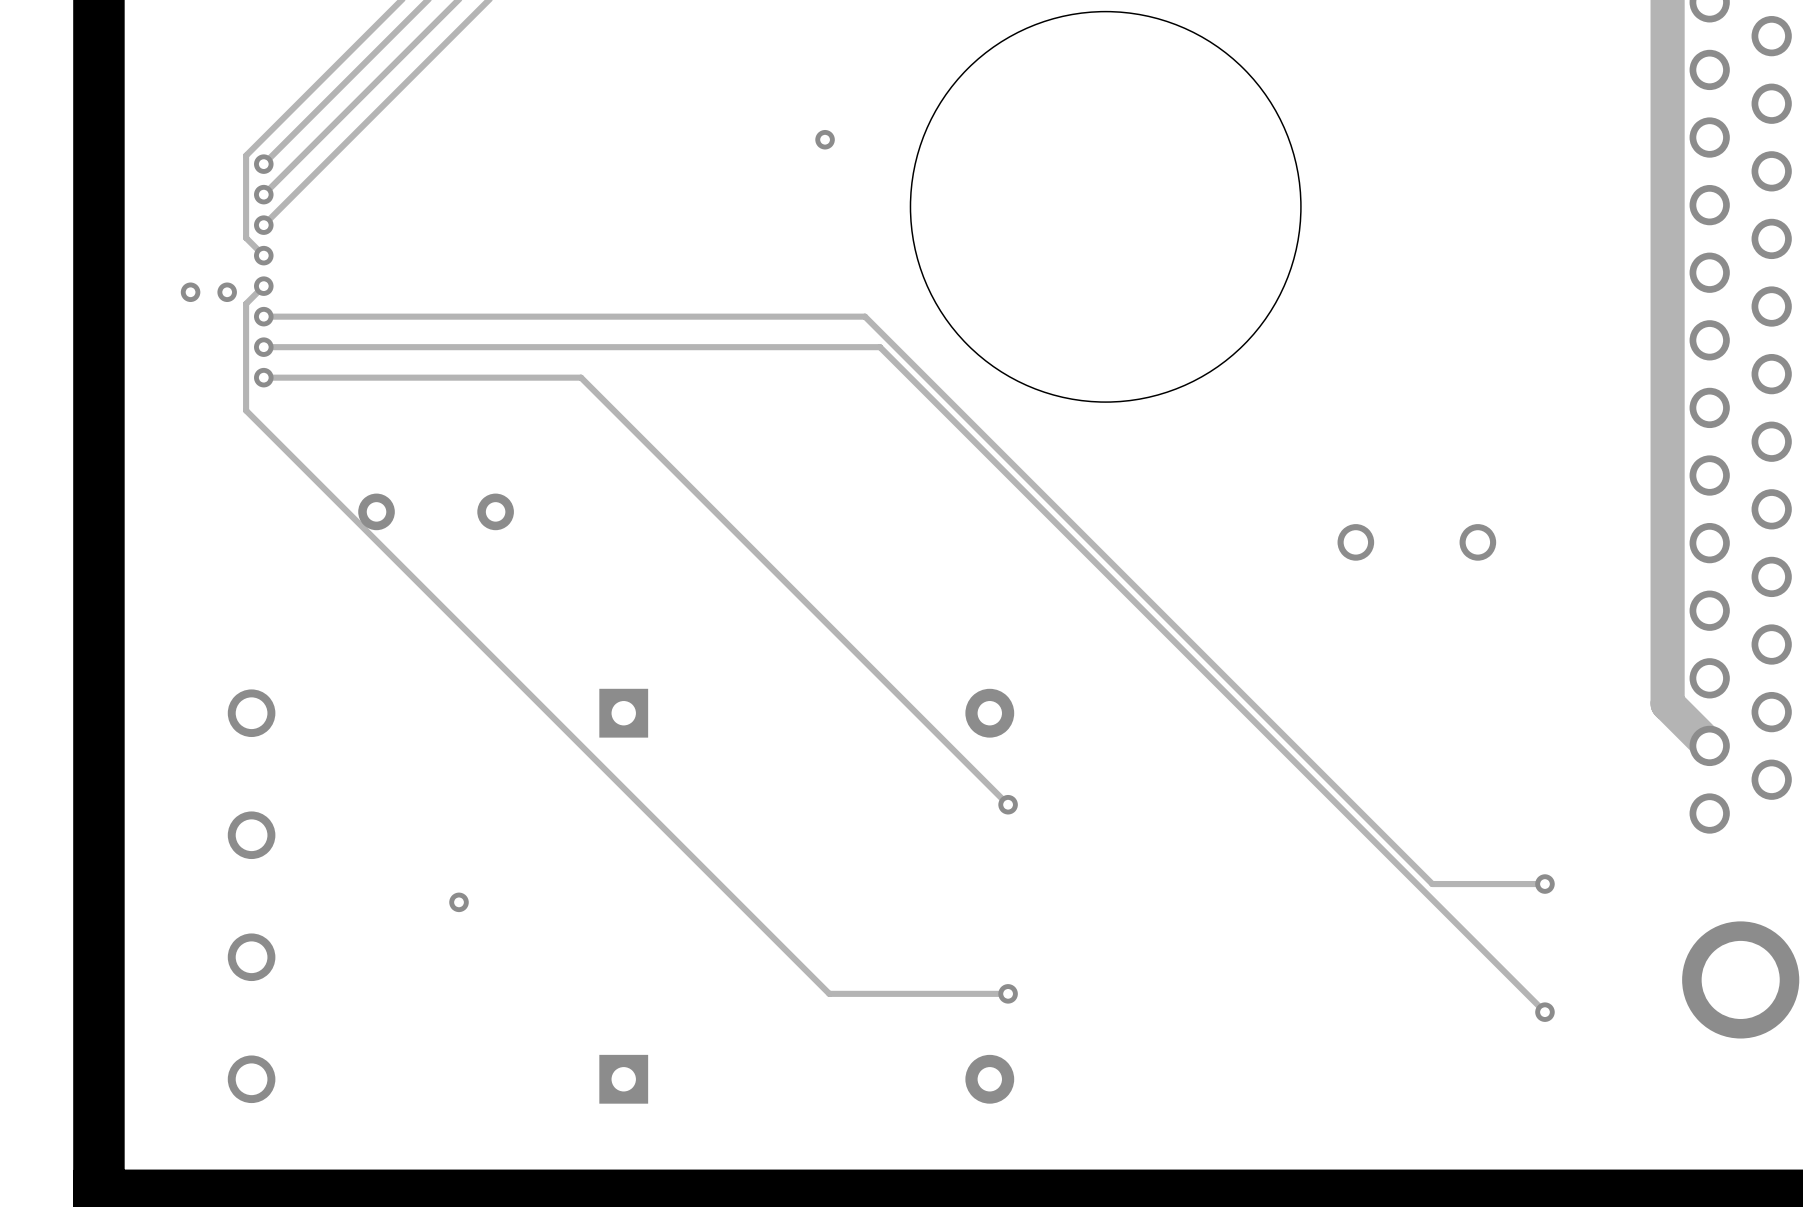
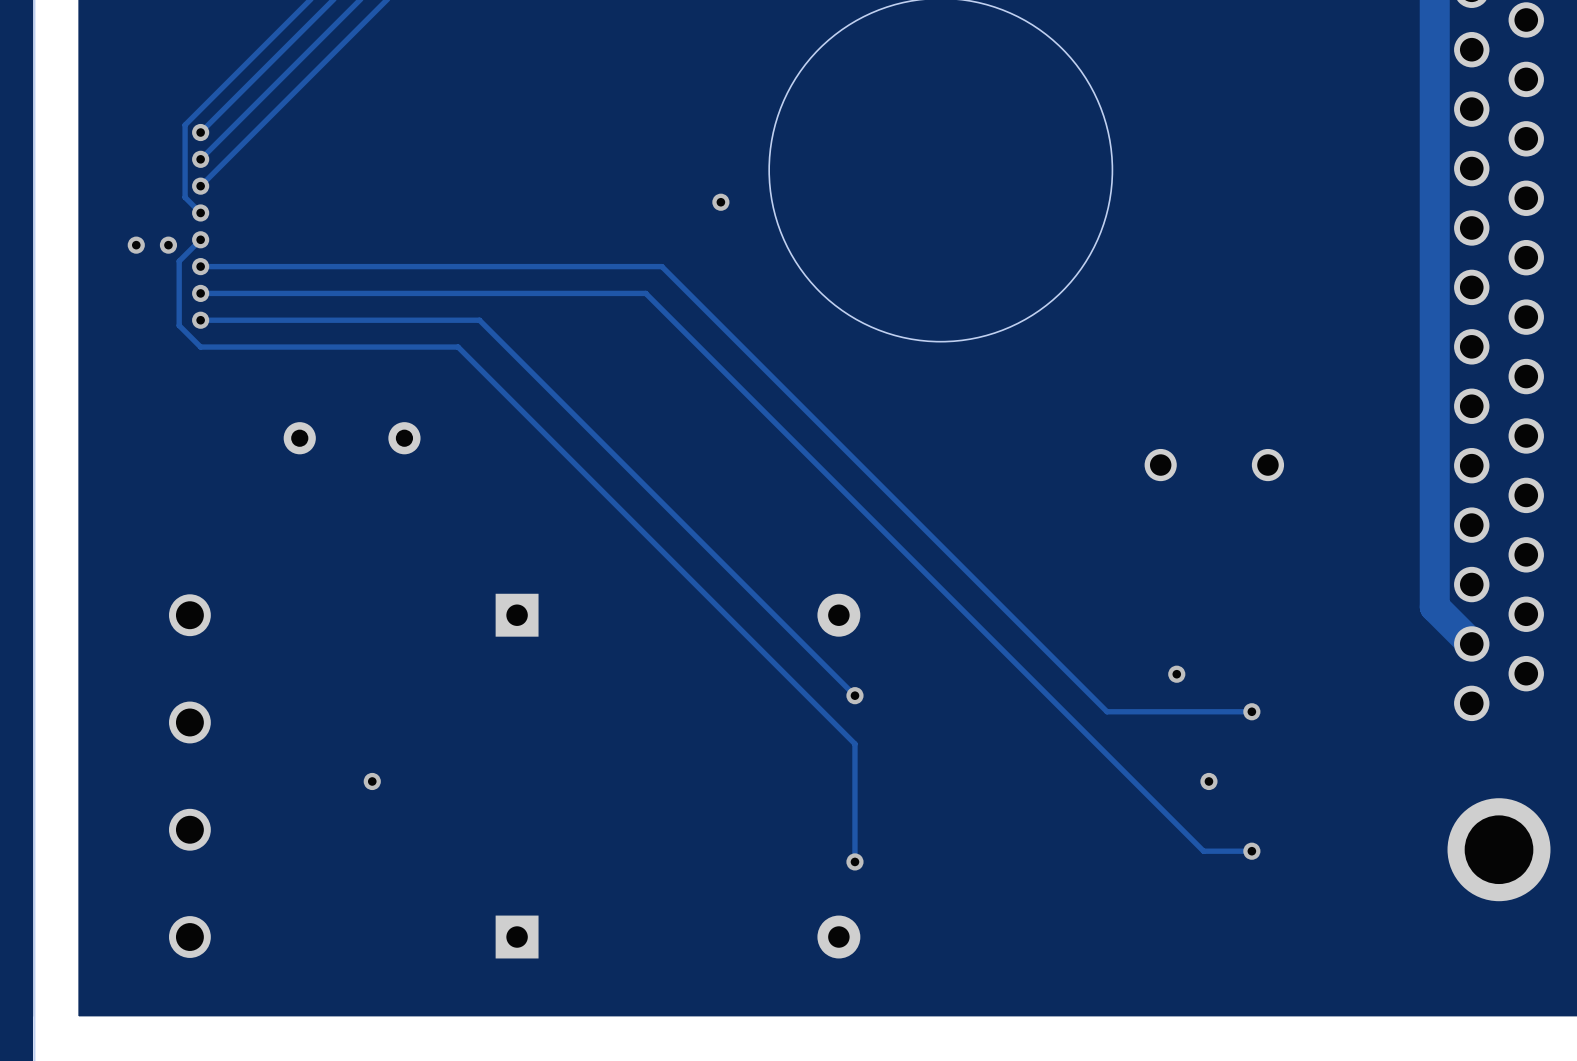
via position: (825, 139) -> (720, 202)
track: (246, 303) (246, 410) (829, 993) (1008, 993) -> (185, 255) (179, 261) (179, 325) (200, 347) (458, 347) (854, 743) (854, 861)
track: (788, 316) (865, 316) (1432, 884) (1544, 884) -> (661, 266) (1107, 711) (1251, 711)
track: (770, 347) (879, 347) (1544, 1012) -> (645, 293) (1203, 851) (1251, 851)
via: none -> (1176, 674)
via: none -> (1251, 711)
via: (1544, 884) -> none
via: none -> (1208, 781)
via: none -> (1251, 851)
via: (1544, 1012) -> none

